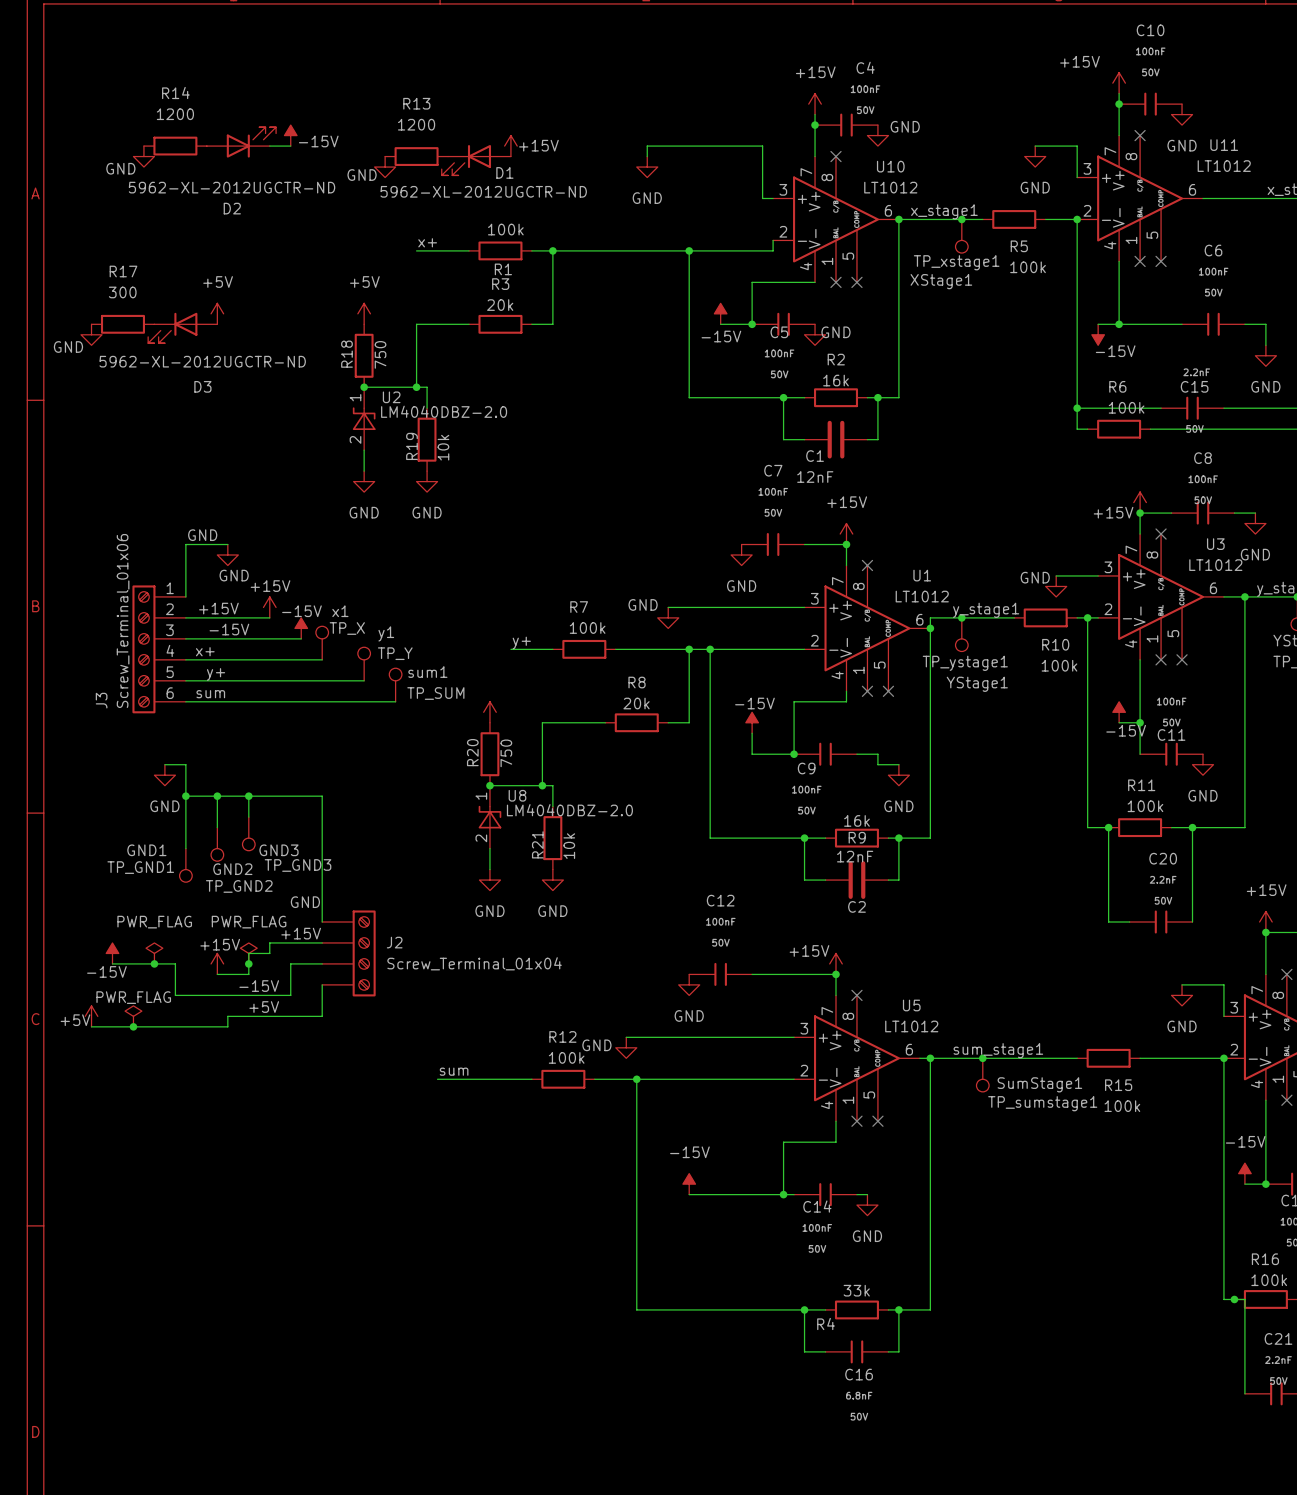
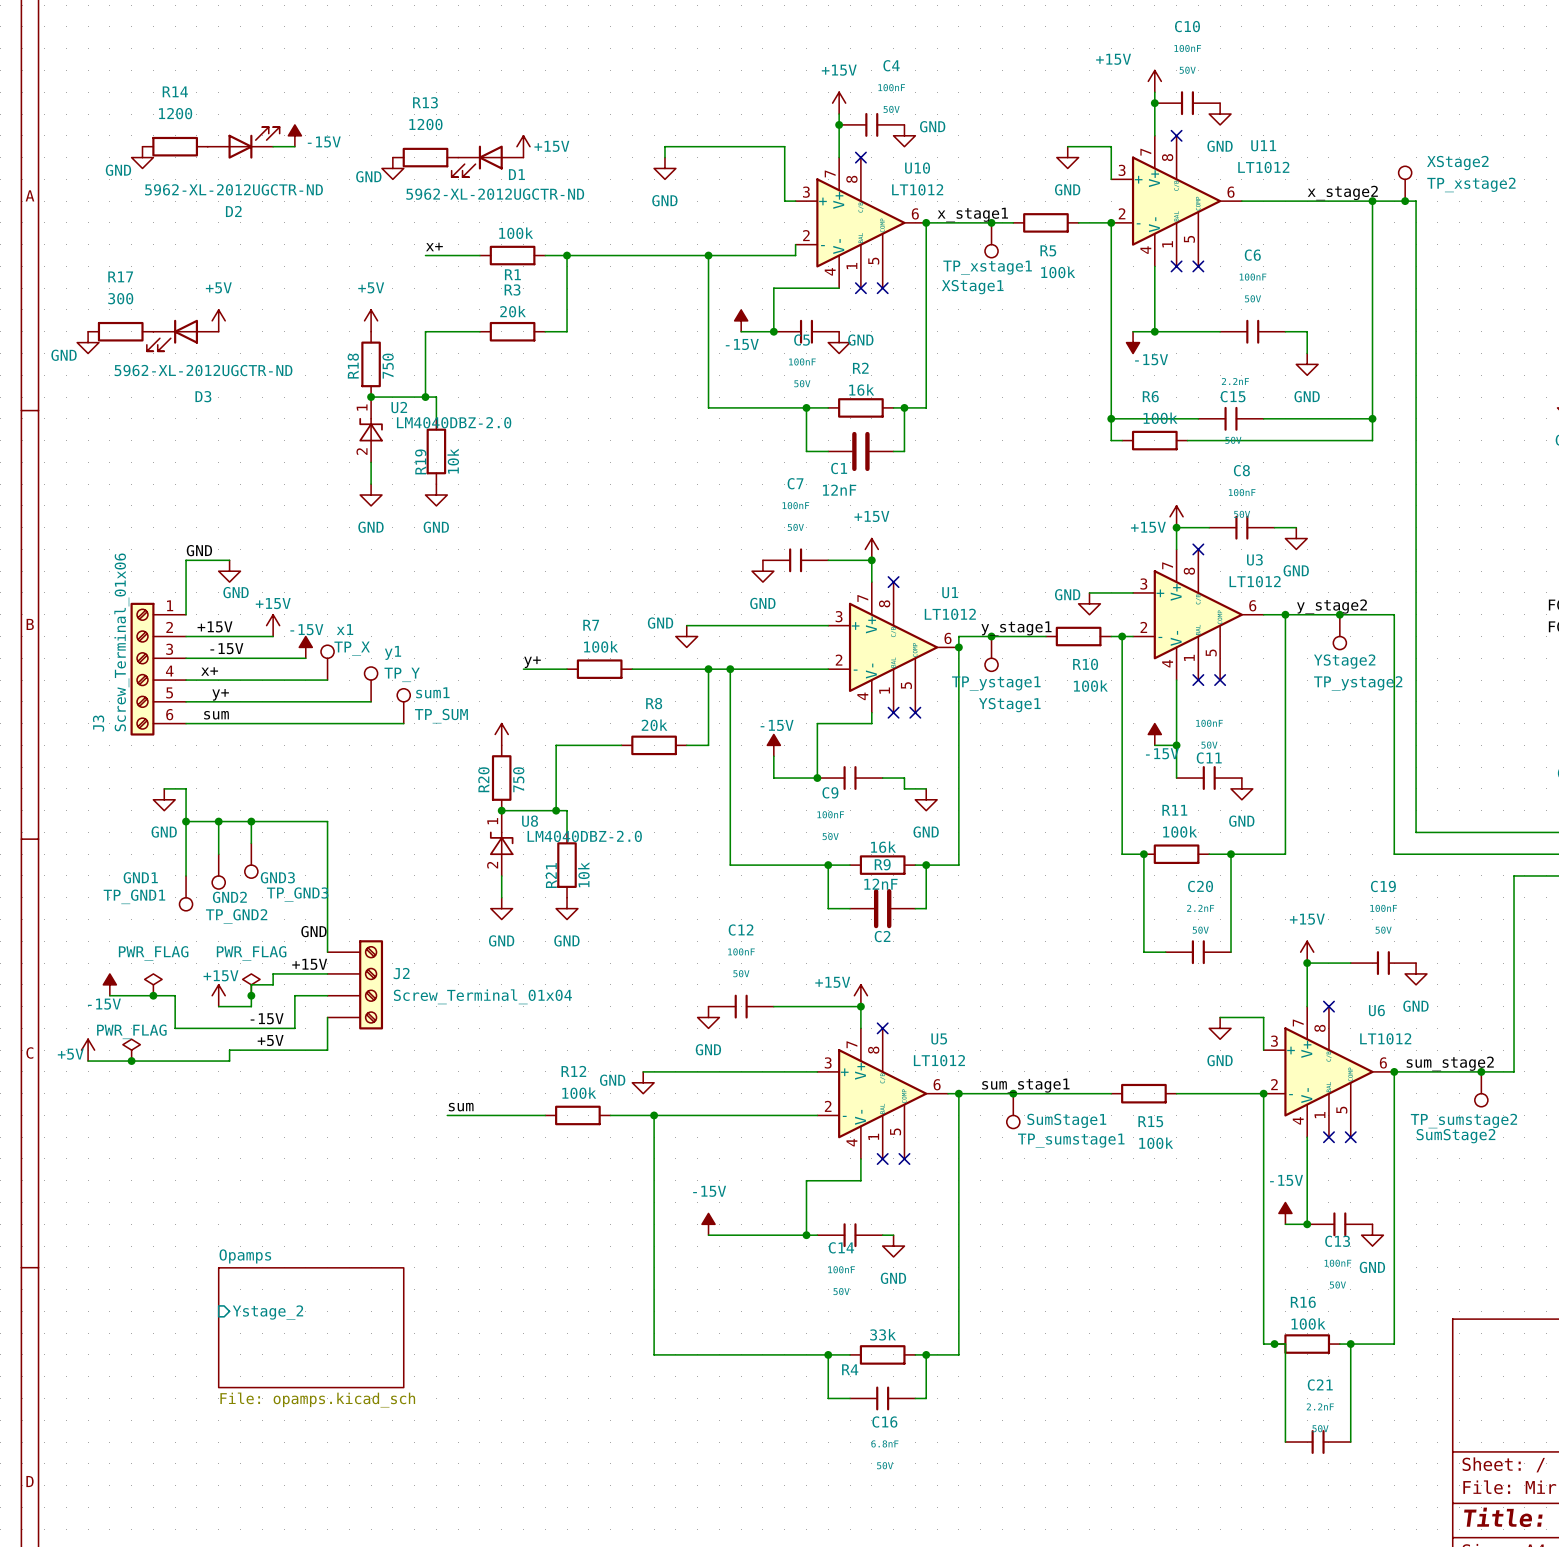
sheet pin: none -> Ystage_2 (267, 1312)
sheet Opamps: none -> File: opamps.kicad_sch (311, 1327)

